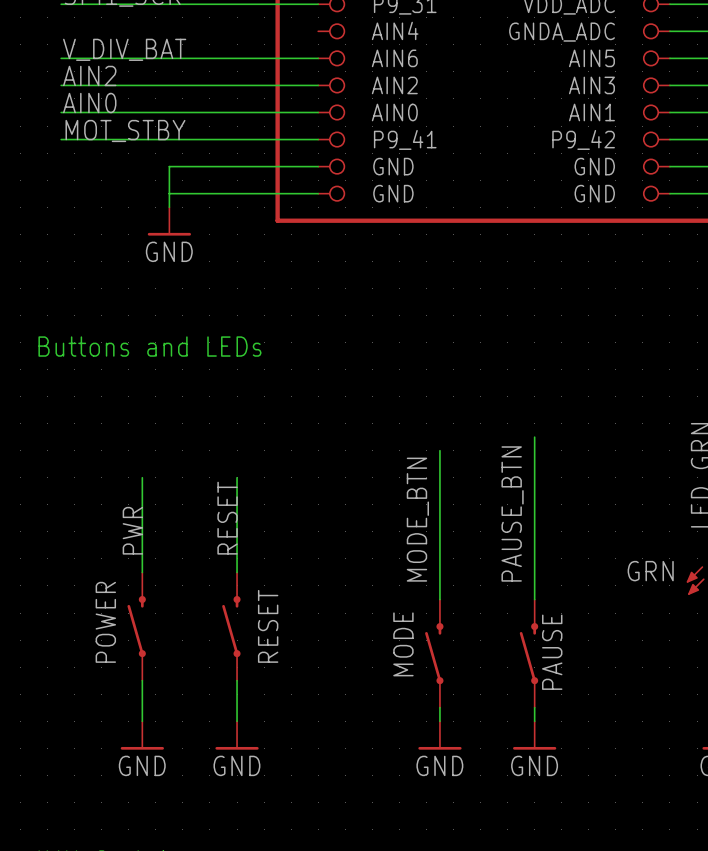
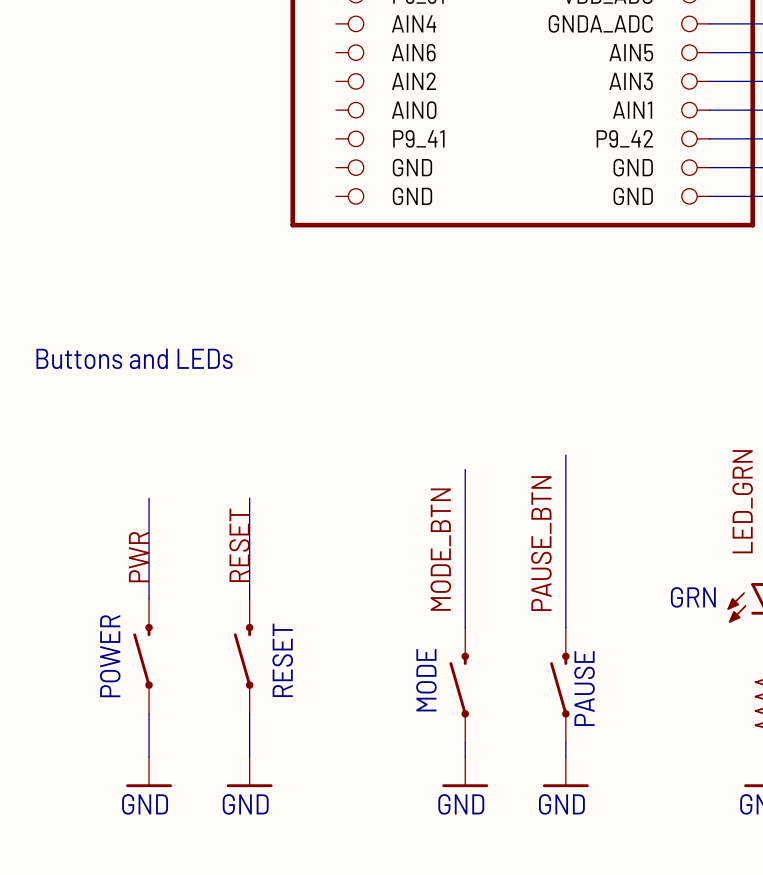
label: V_DIV_BAT (124, 49) -> none
wire: (61, 58) (318, 58) -> none
label: AIN2 (89, 75) -> none
wire: (61, 85) (318, 85) -> none
label: AIN0 (89, 103) -> none
wire: (61, 112) (318, 112) -> none
label: MOT_STBY (125, 130) -> none
wire: (61, 139) (318, 139) -> none
wire: (318, 166) (169, 166) (169, 207) -> none
wire: (169, 193) (318, 193) -> none
power symbol: GND (169, 221) -> none

